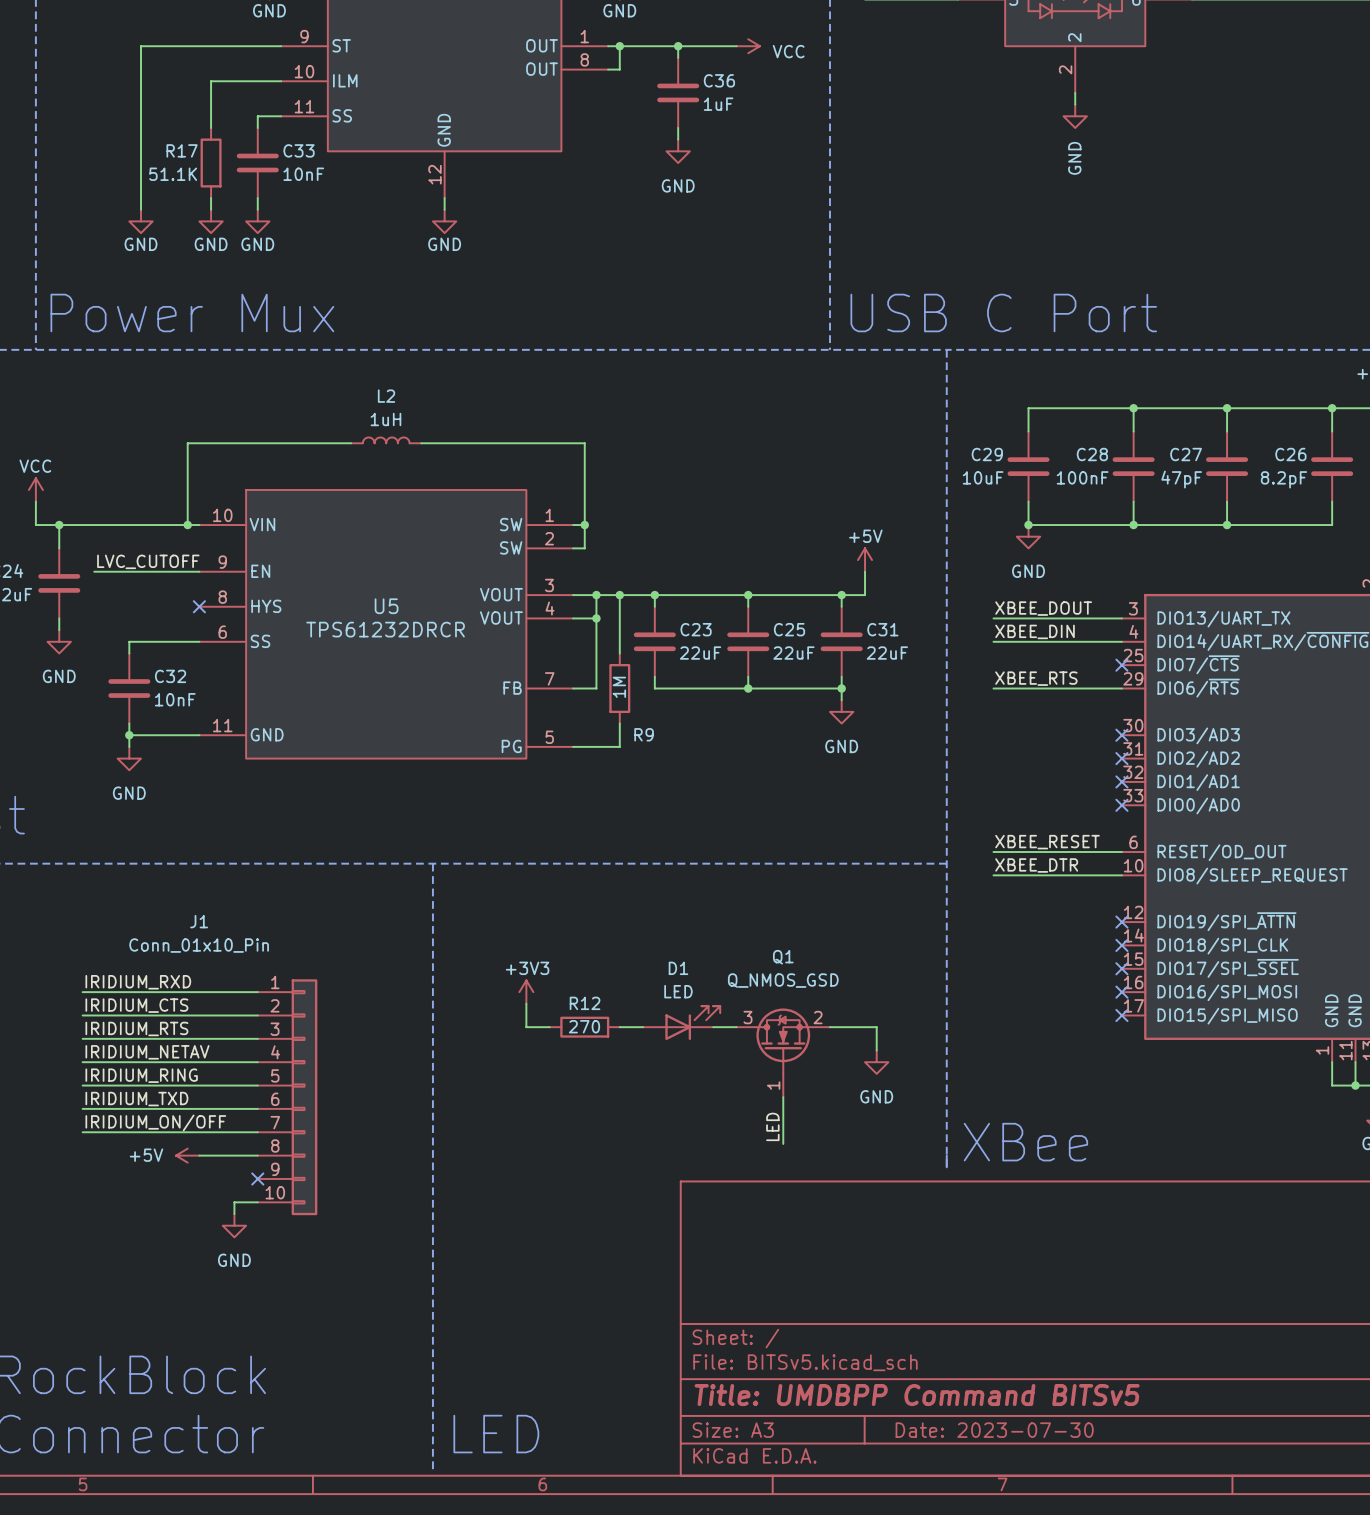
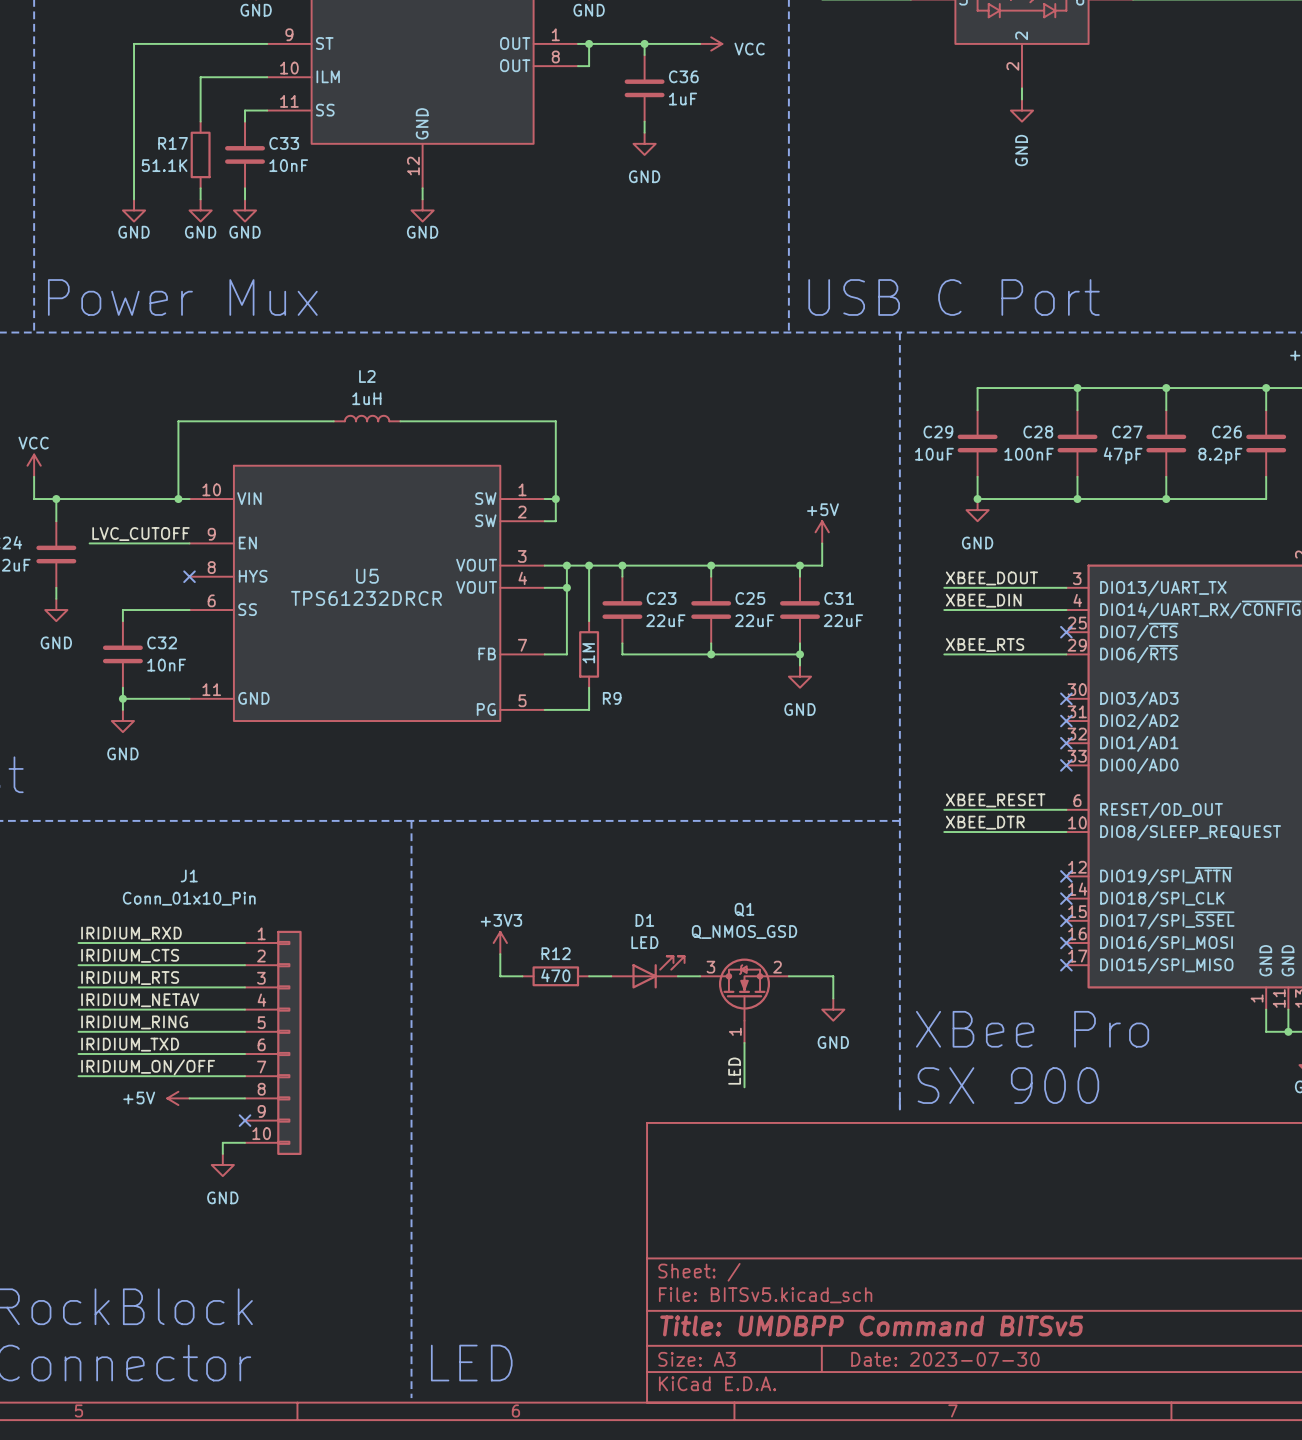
R12 value: 270 (584, 1026) -> 470 (555, 975)
text: none -> XBee Pro (1032, 1029)
text: XBee (1025, 1142) -> SX 900 (1008, 1085)

